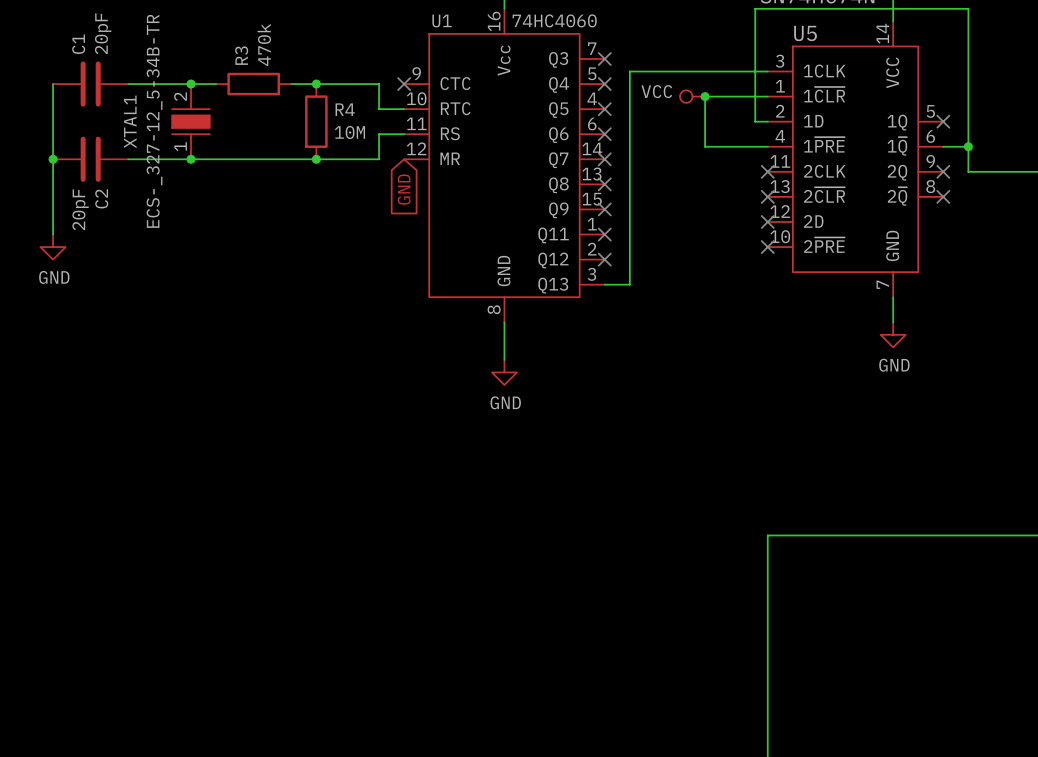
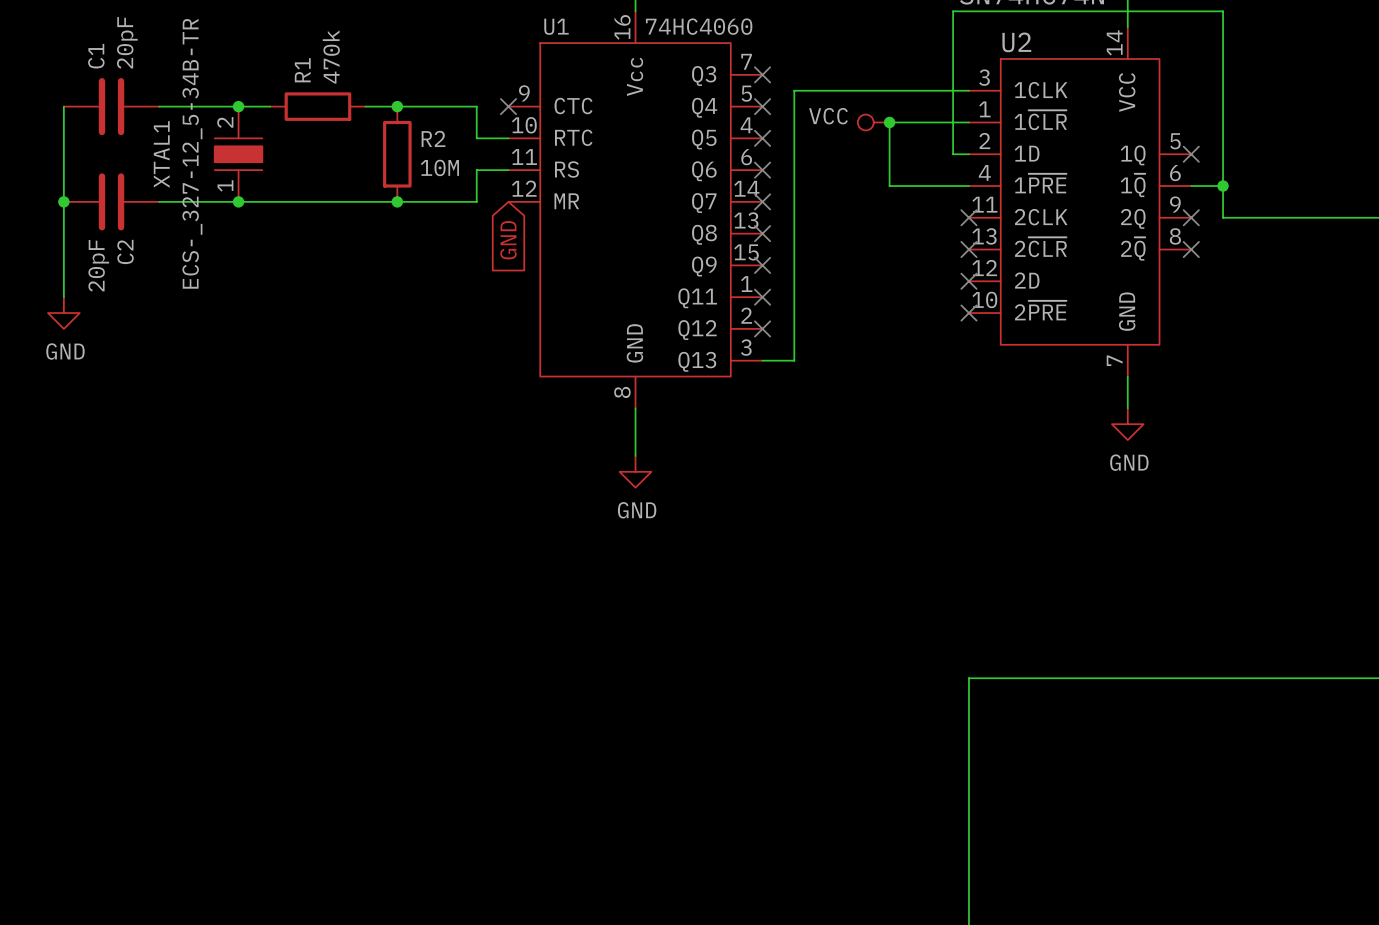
U5 name: U5 (805, 33) -> U2 (1016, 42)
R3 name: R3 (241, 55) -> R1 (302, 70)
R4 name: R4 (345, 109) -> R2 (433, 138)

